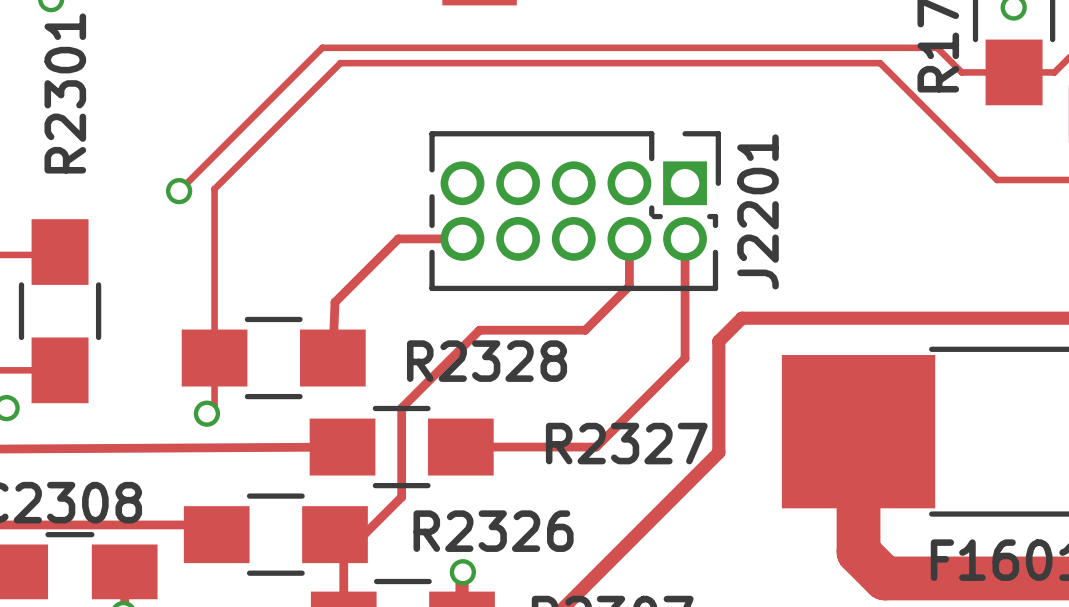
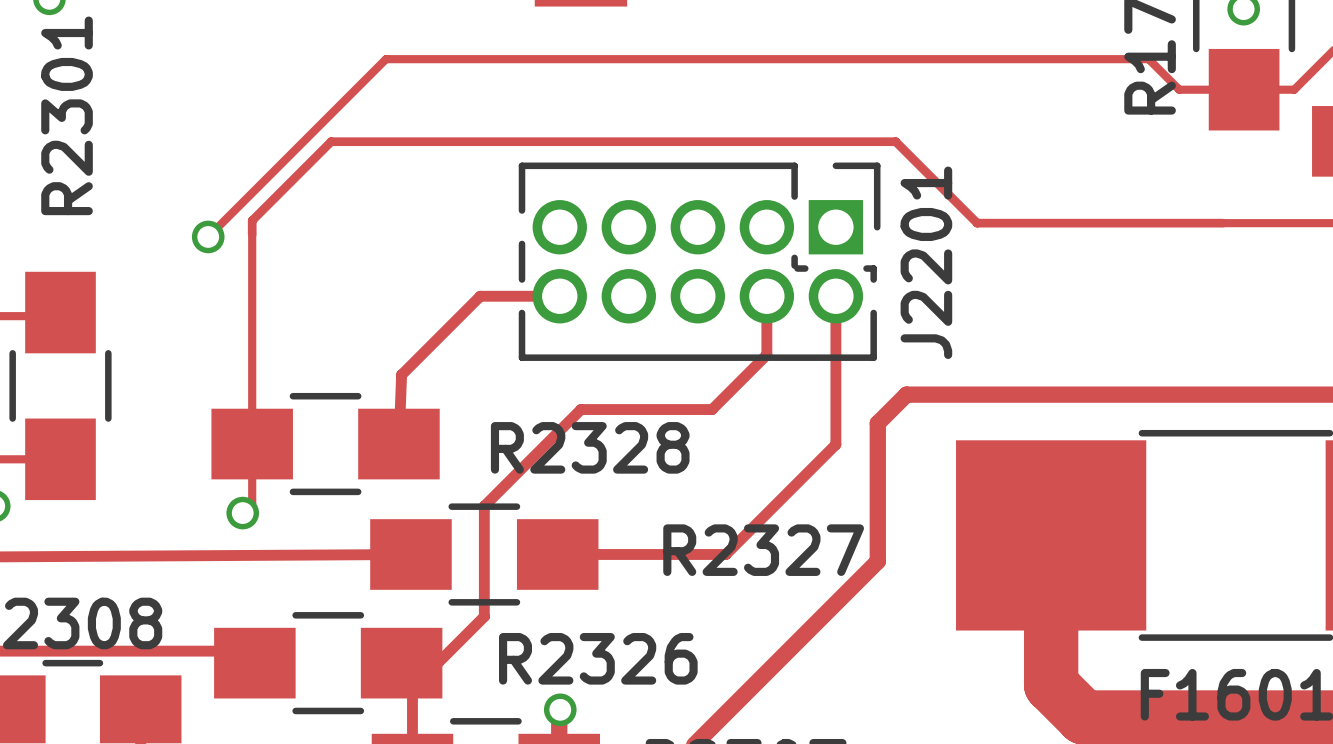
track: (997, 179) (880, 63) (340, 63) (214, 189) -> (1222, 223) (977, 223) (895, 141) (331, 141) (252, 220) (252, 234)

